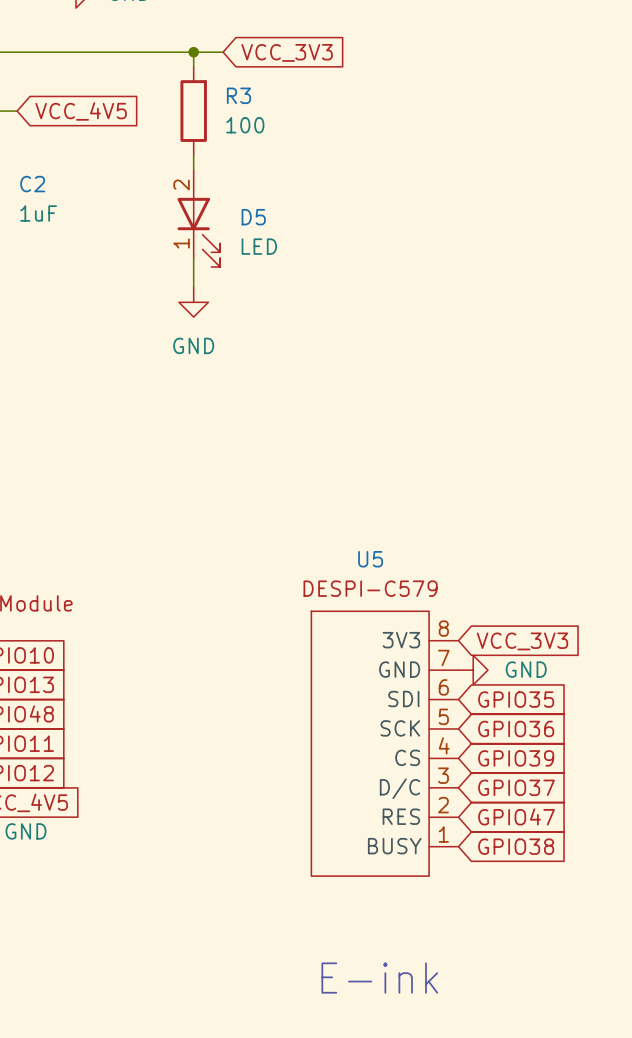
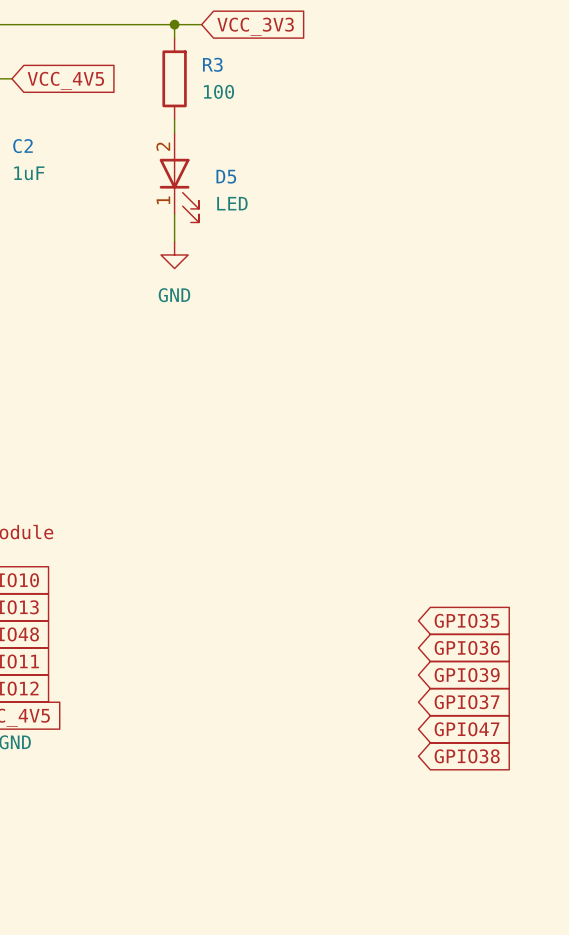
global label: VCC_3V3 (522, 641) -> none
power symbol: GND (473, 670) -> none
U5: (384, 743) -> none
text: E-ink (379, 978) -> none

